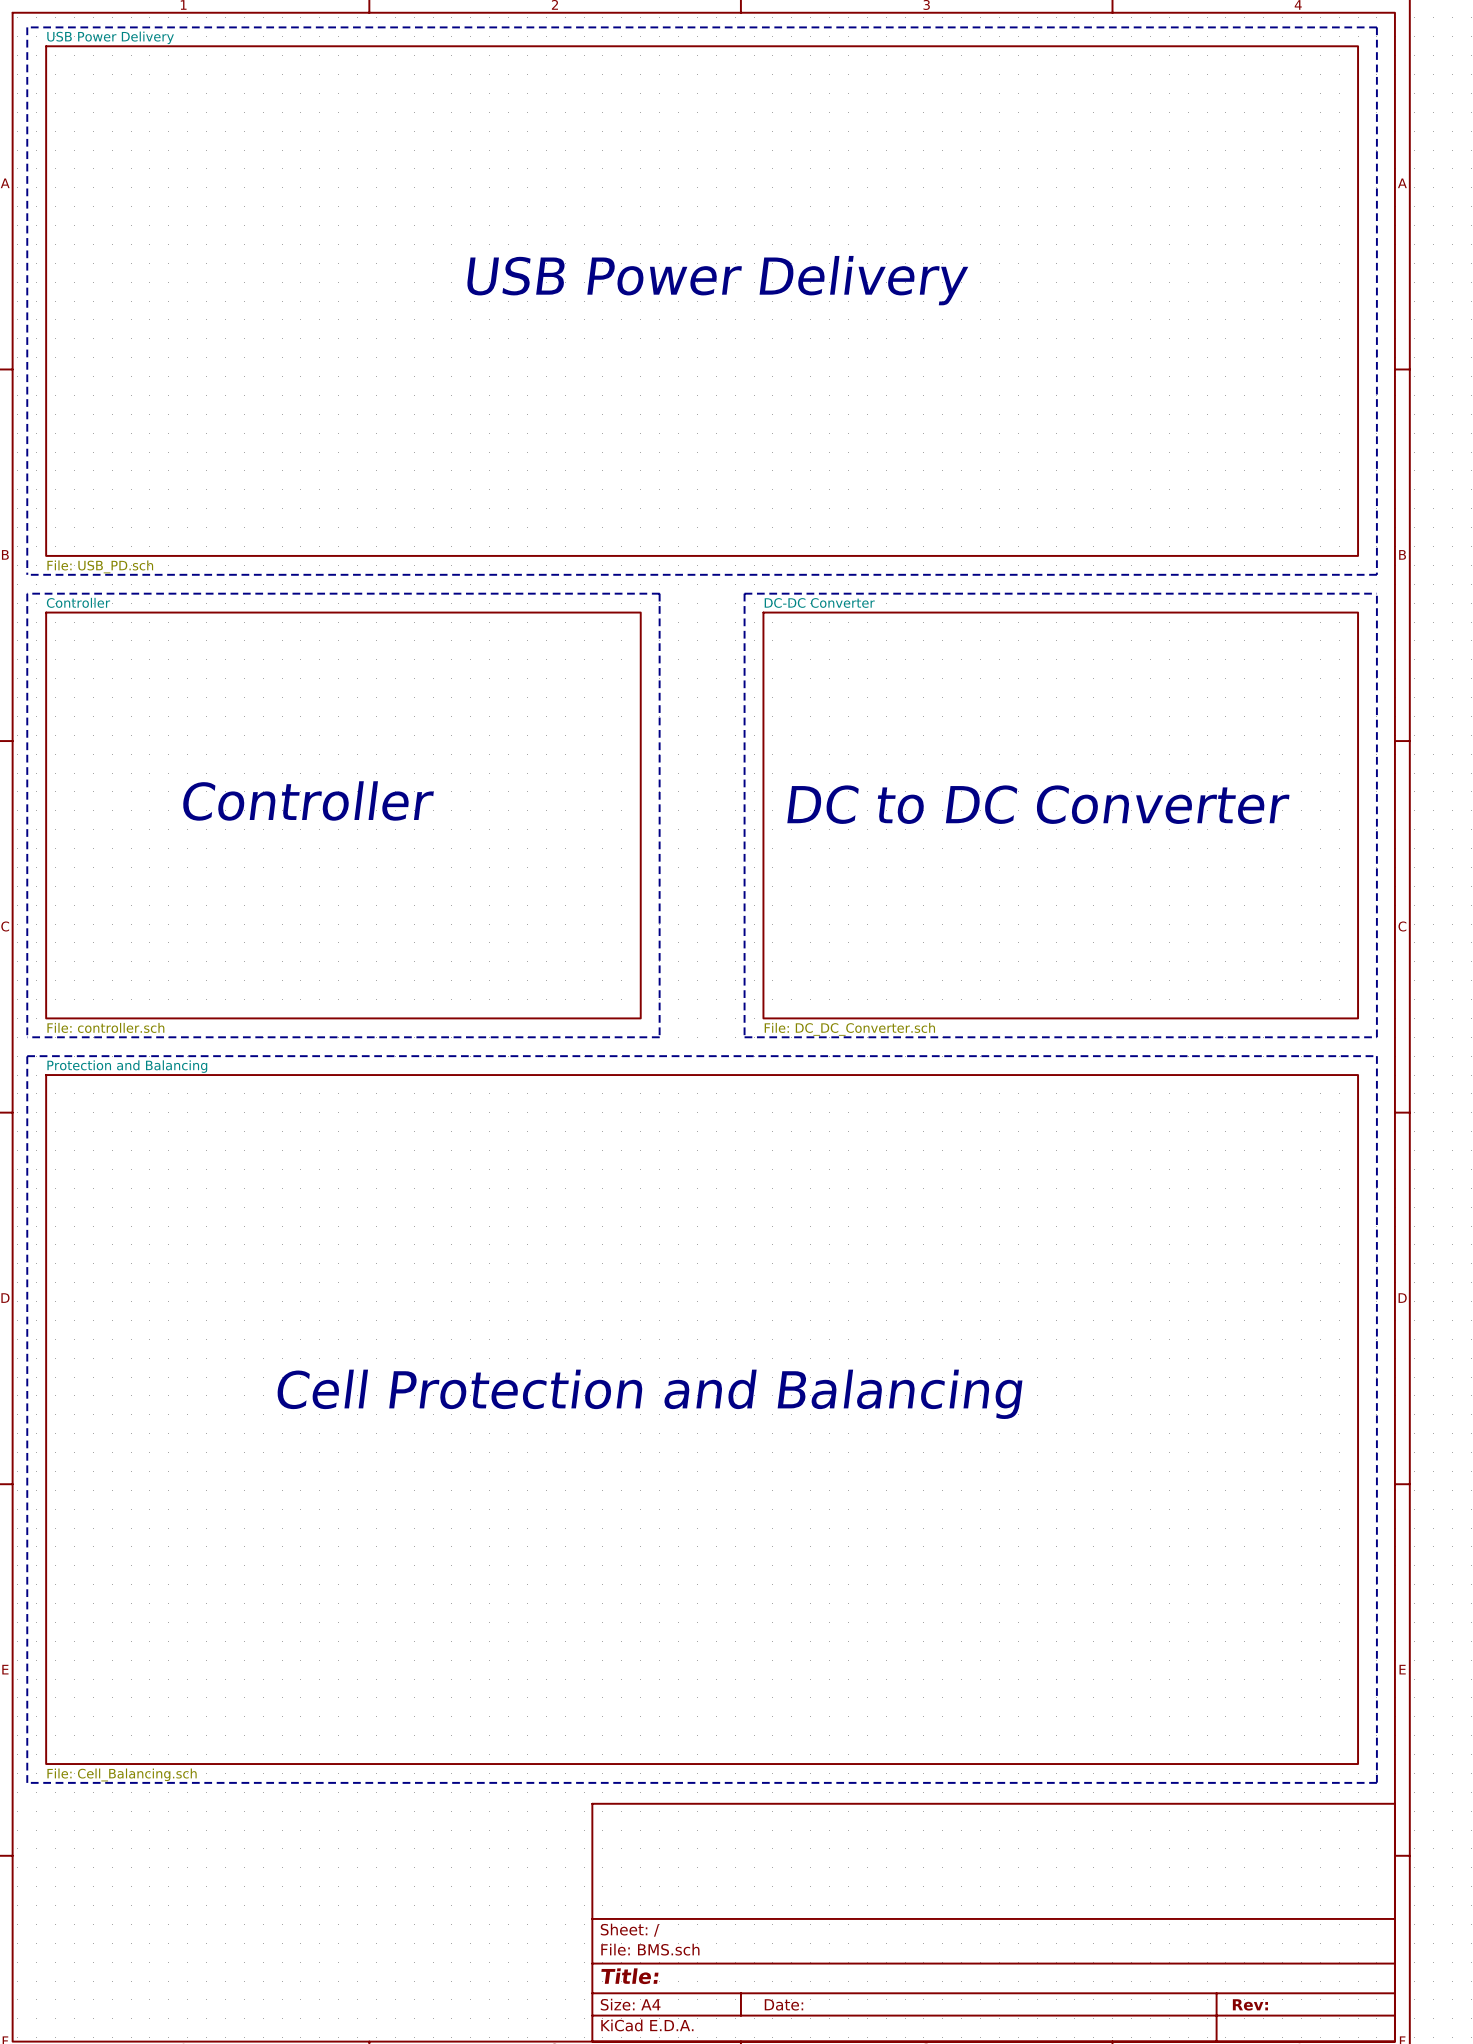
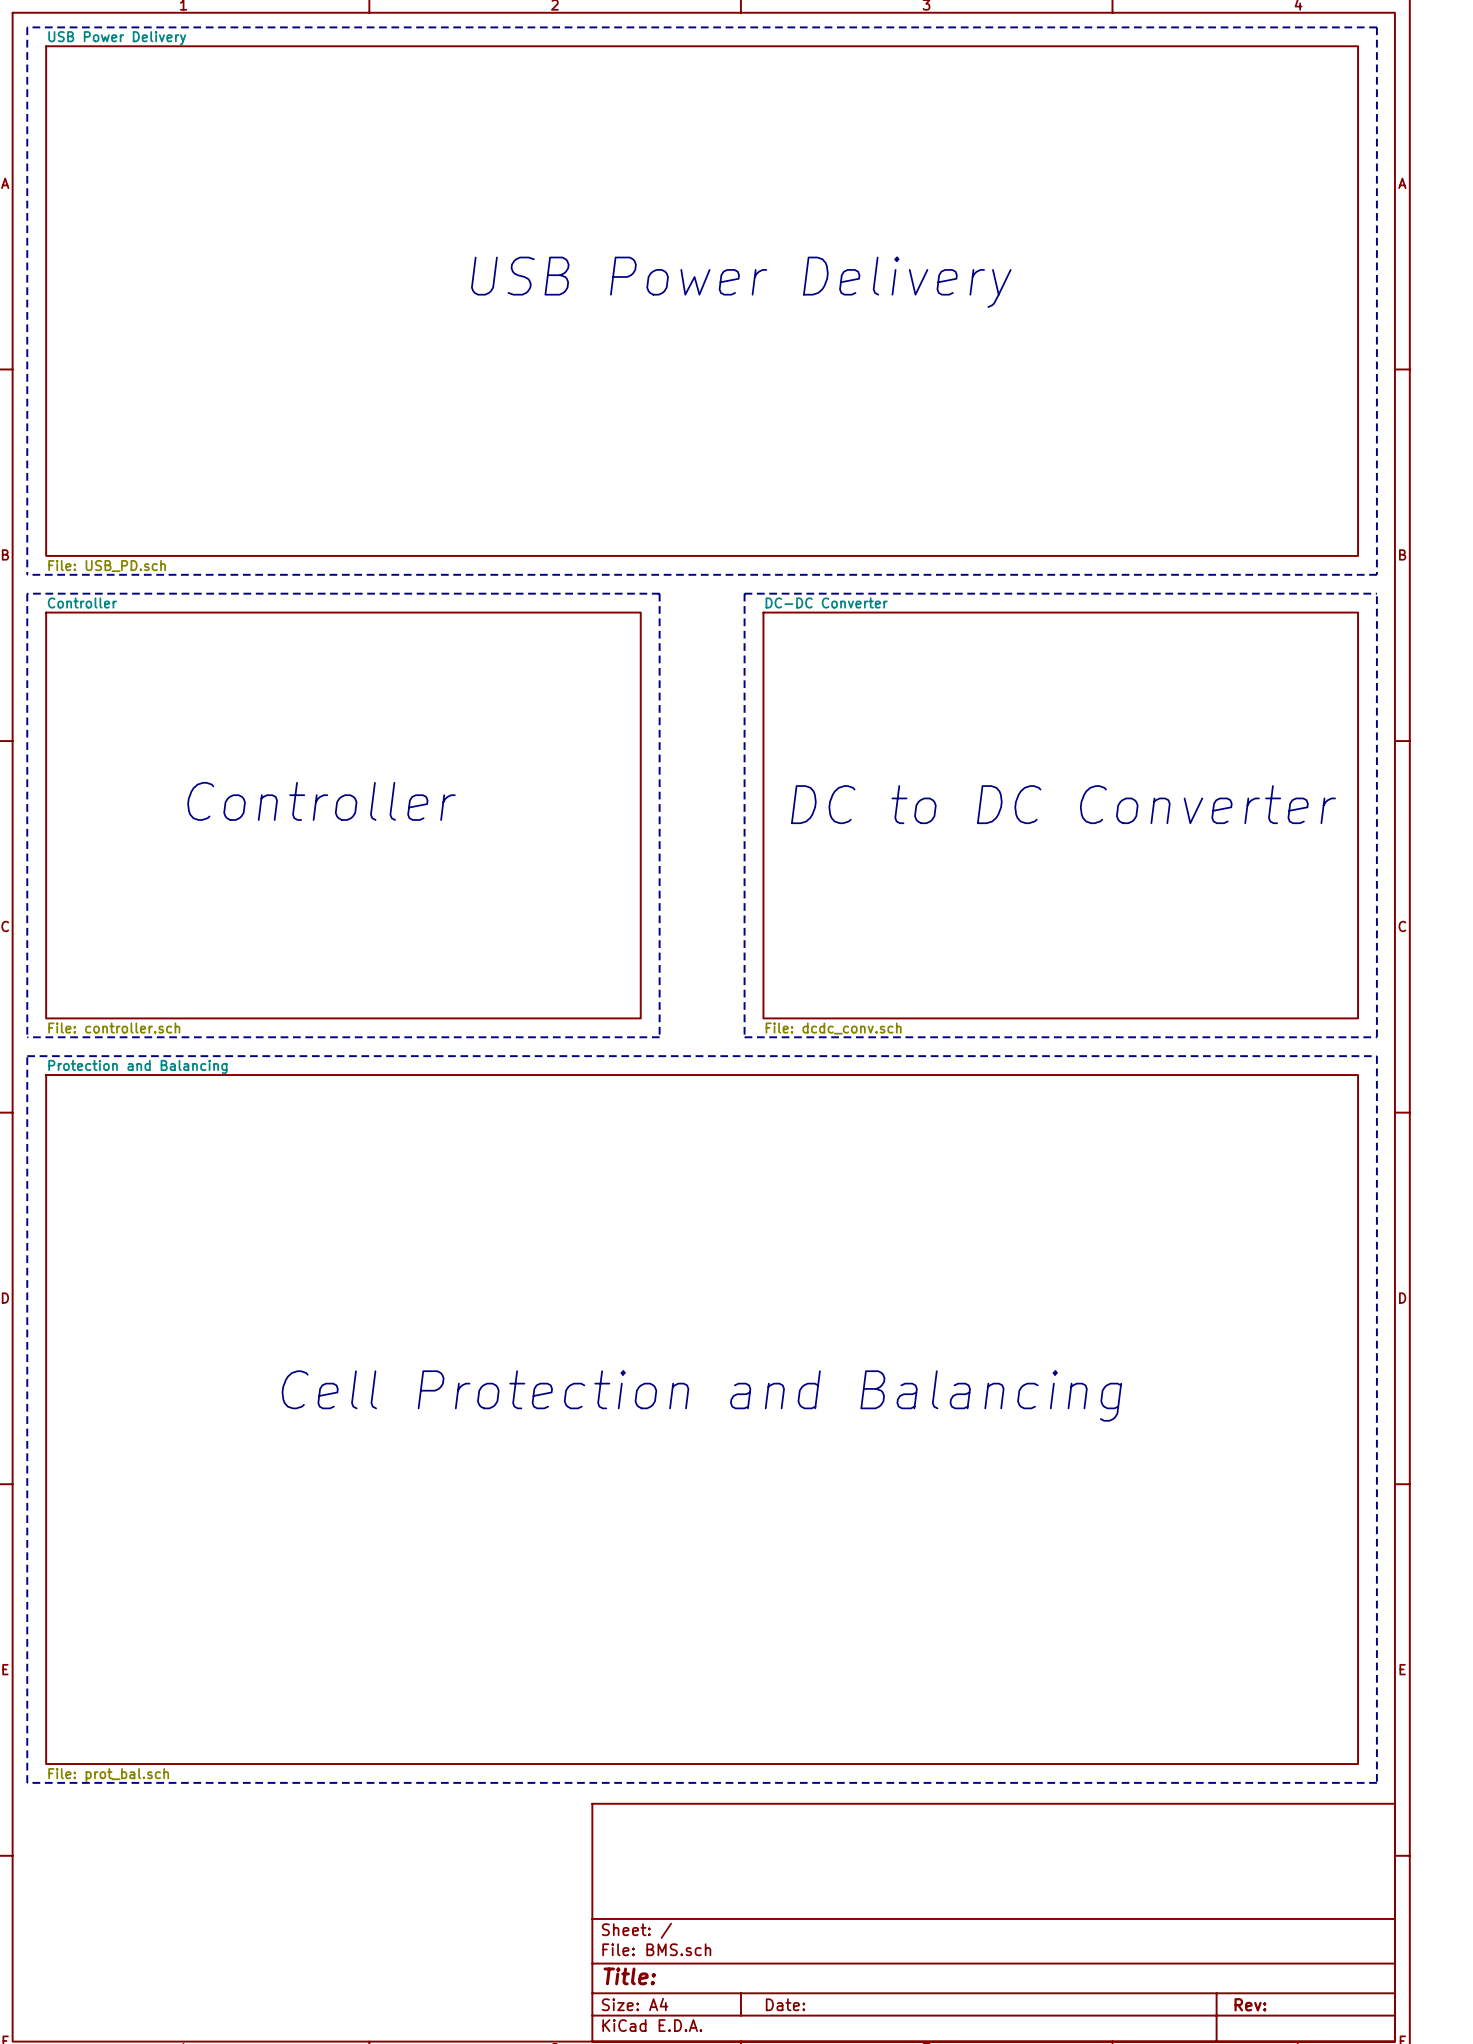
sheet DC-DC Converter value: File: DC_DC_Converter.sch (849, 1029) -> File: dcdc_conv.sch (833, 1028)
sheet Protection and Balancing value: File: Cell_Balancing.sch (122, 1774) -> File: prot_bal.sch (108, 1775)

